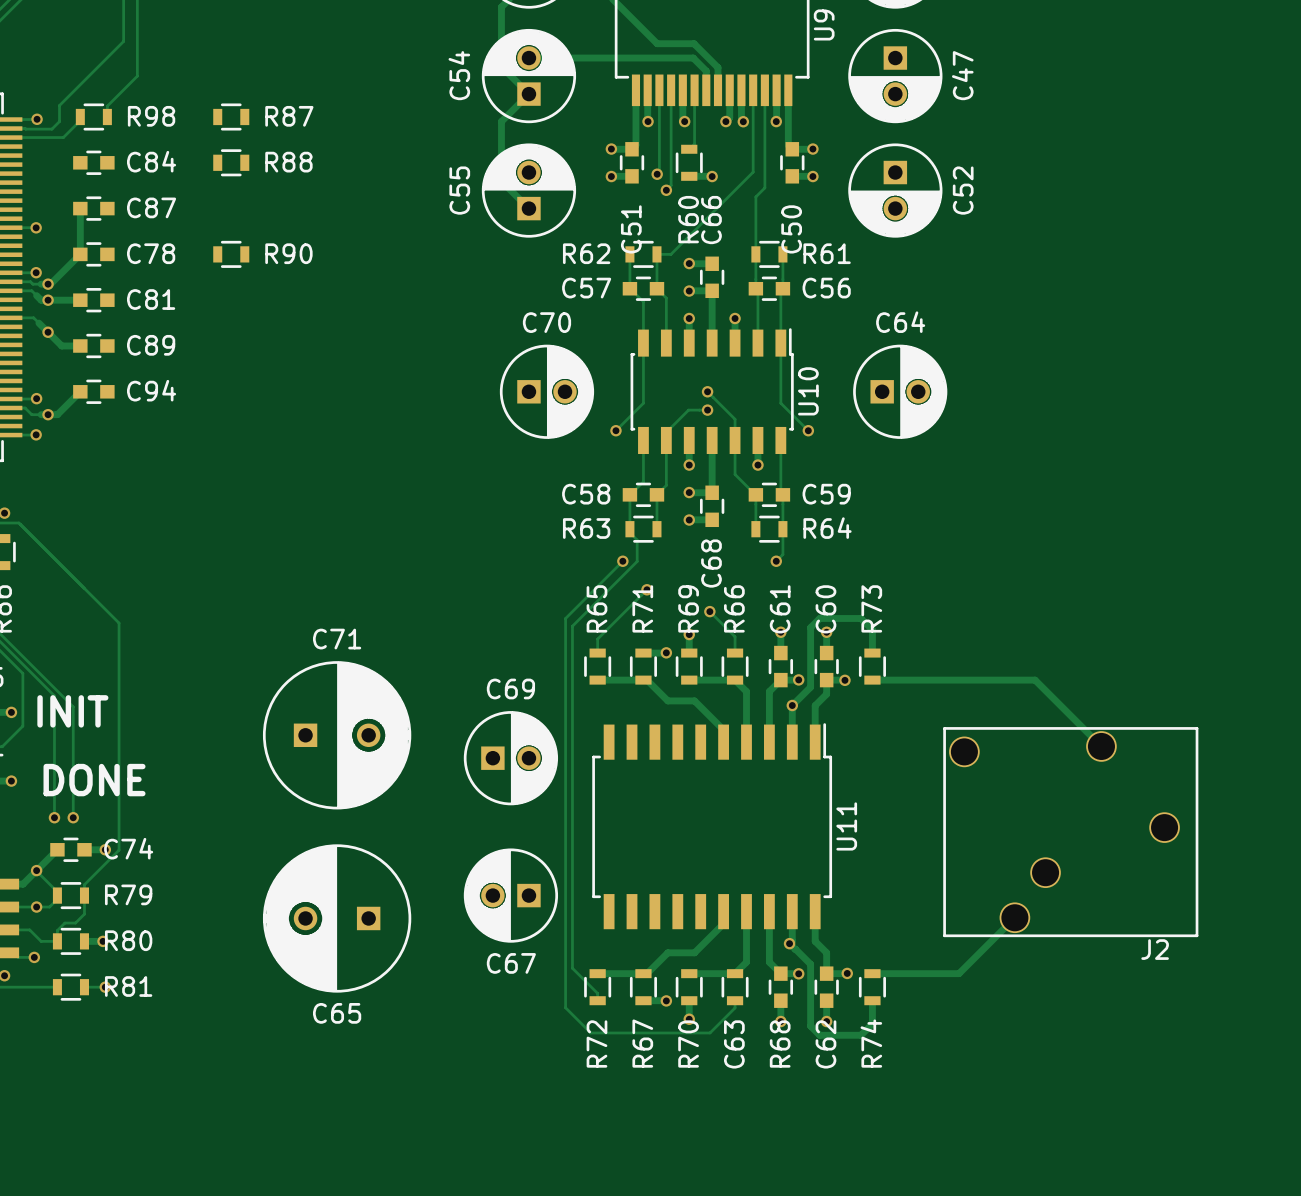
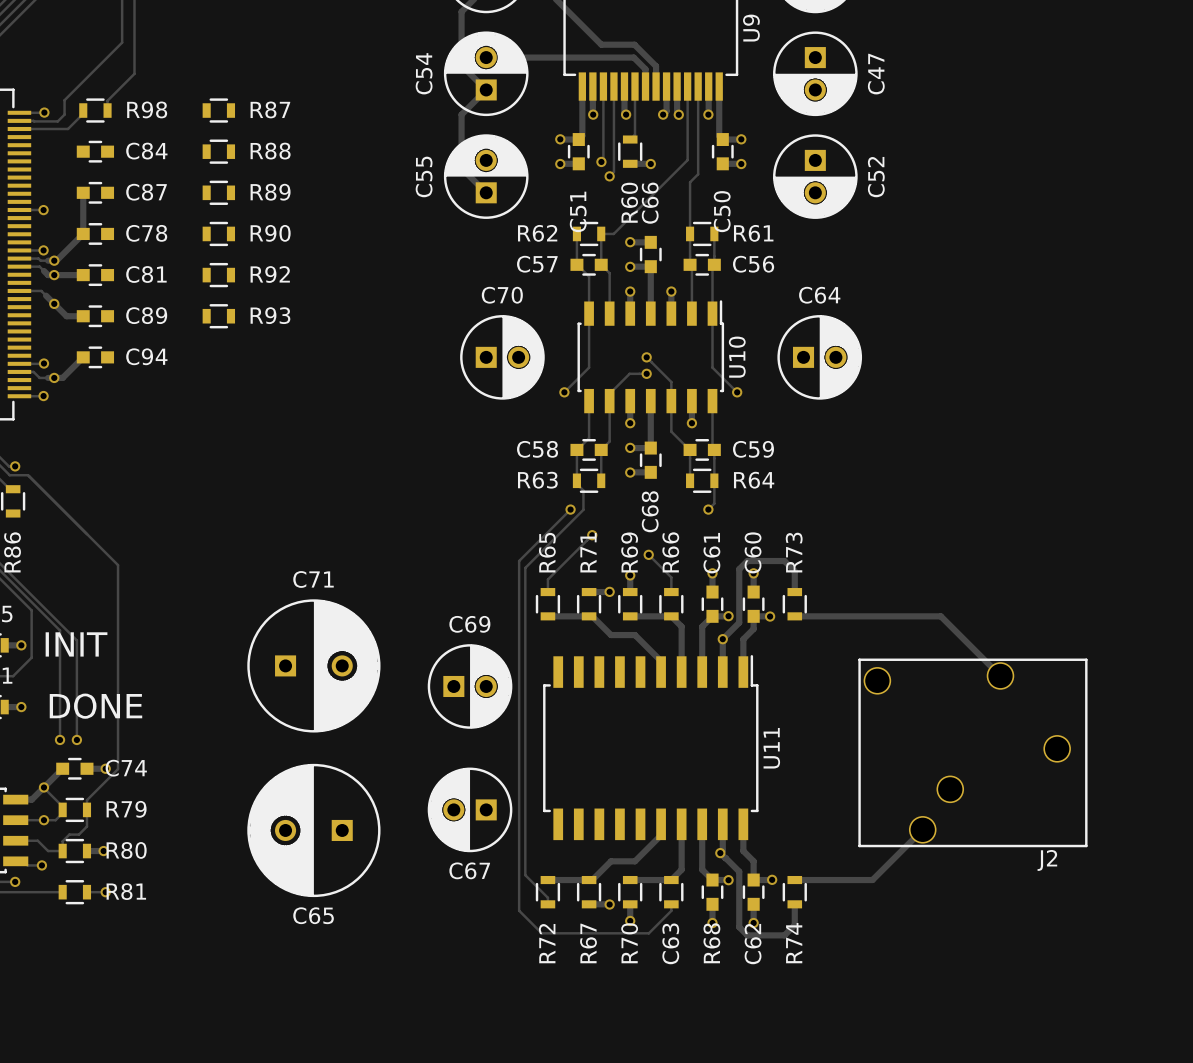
R89: none -> (218, 192)
R92: none -> (218, 275)
R93: none -> (218, 316)

